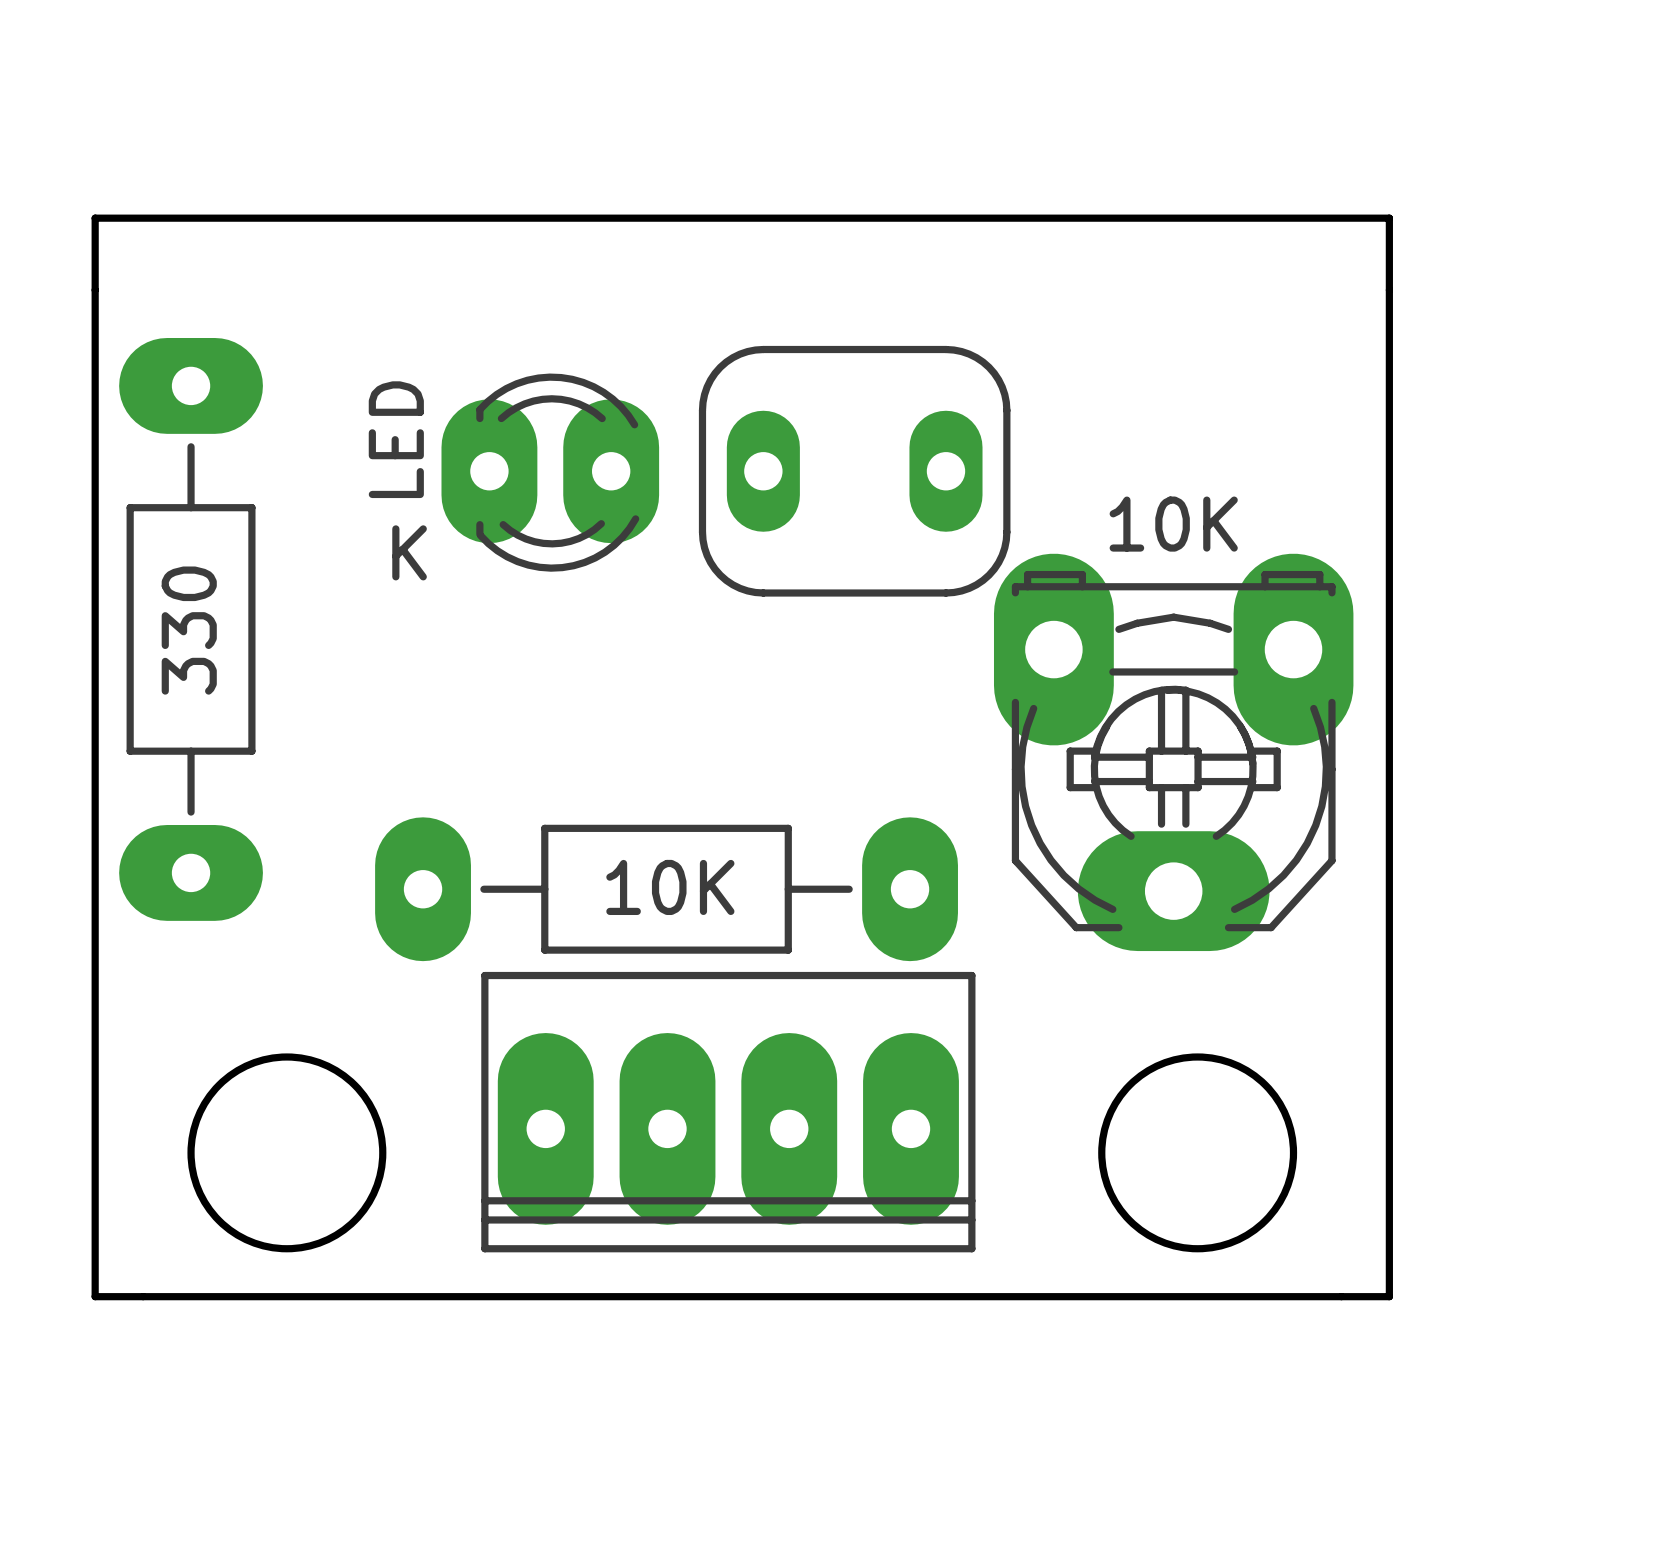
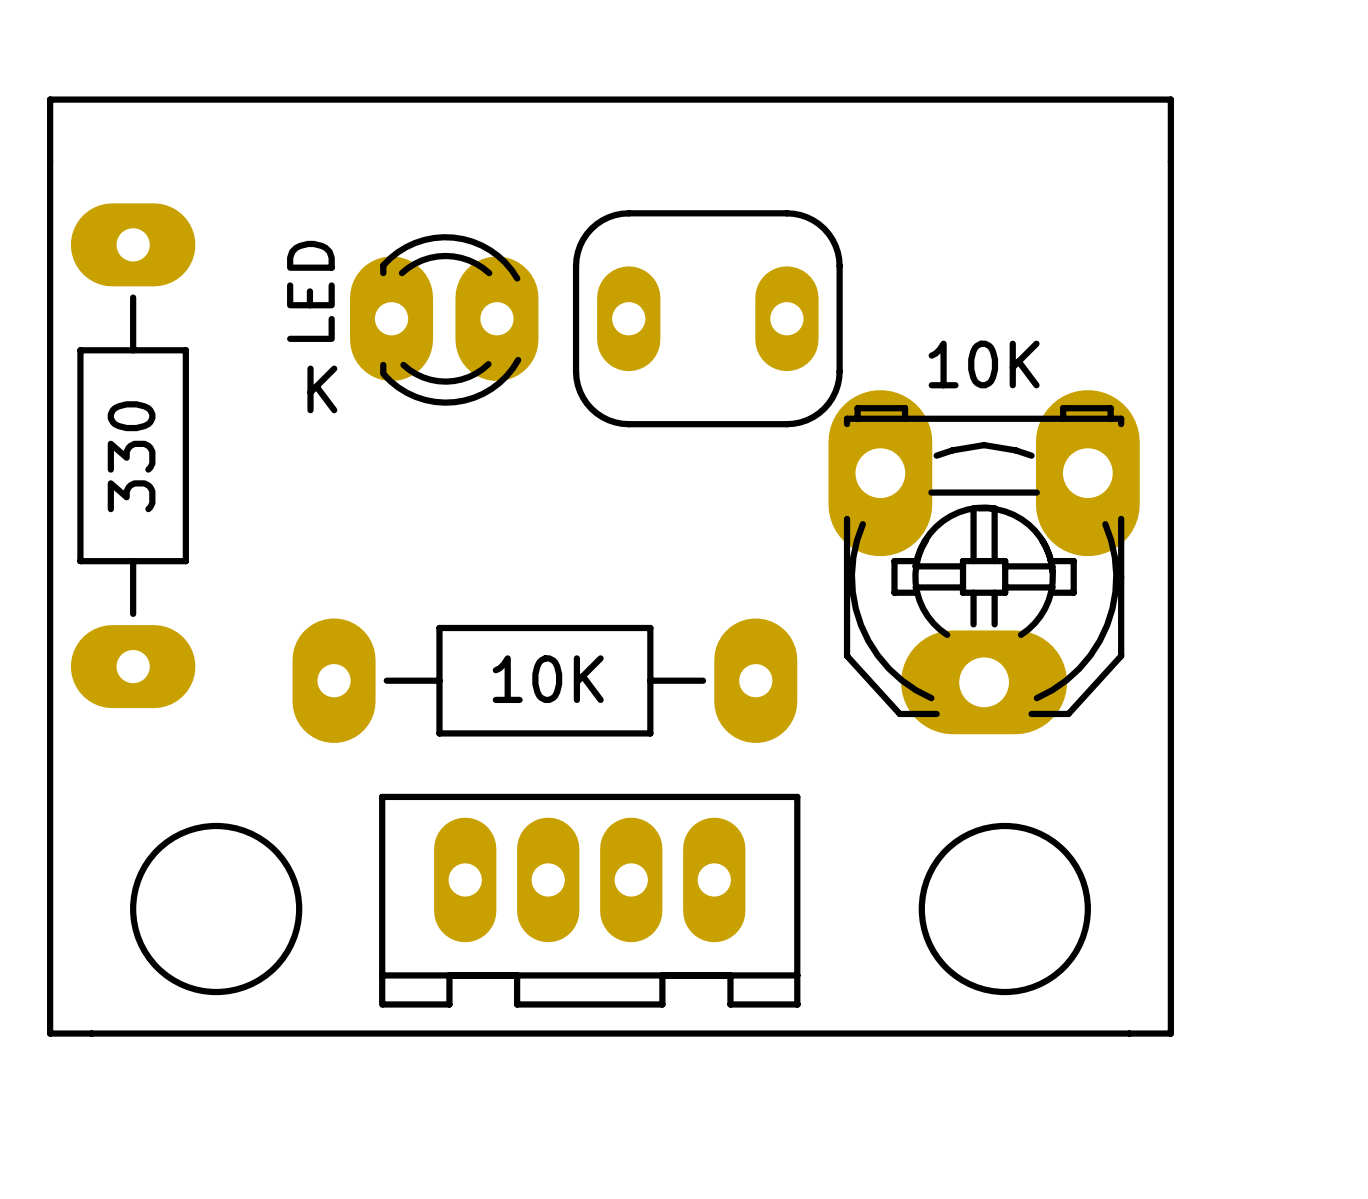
part footprint: [481, 971, 976, 1253] -> [379, 793, 801, 1008]

